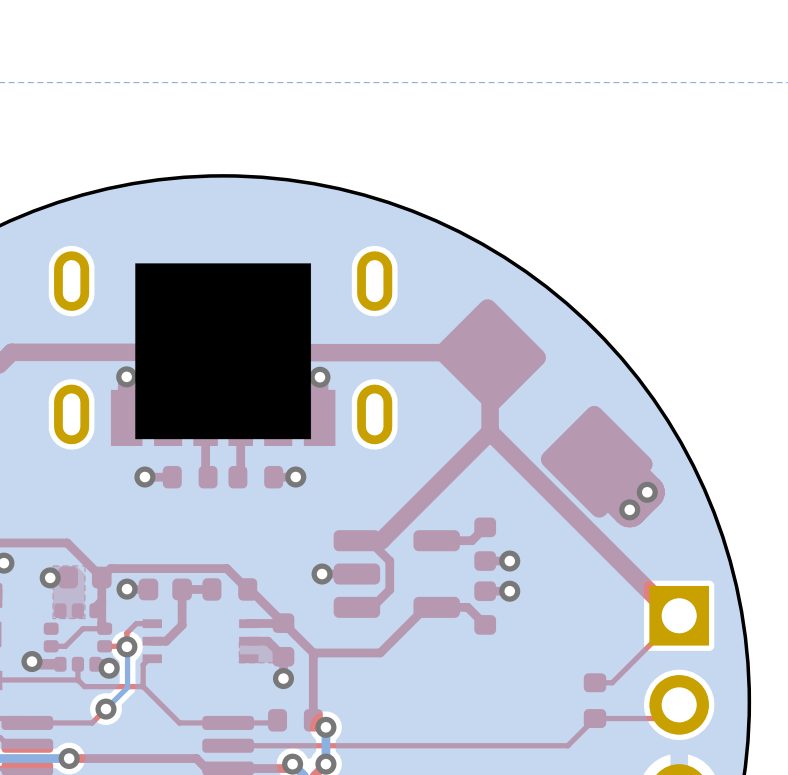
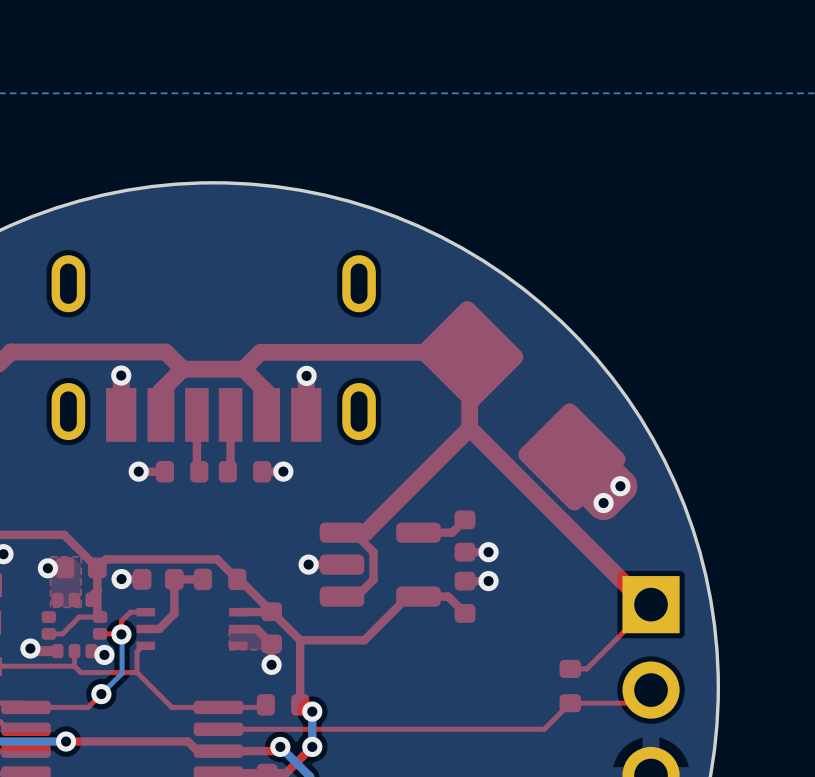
drawing: [135, 263, 312, 440] -> none

